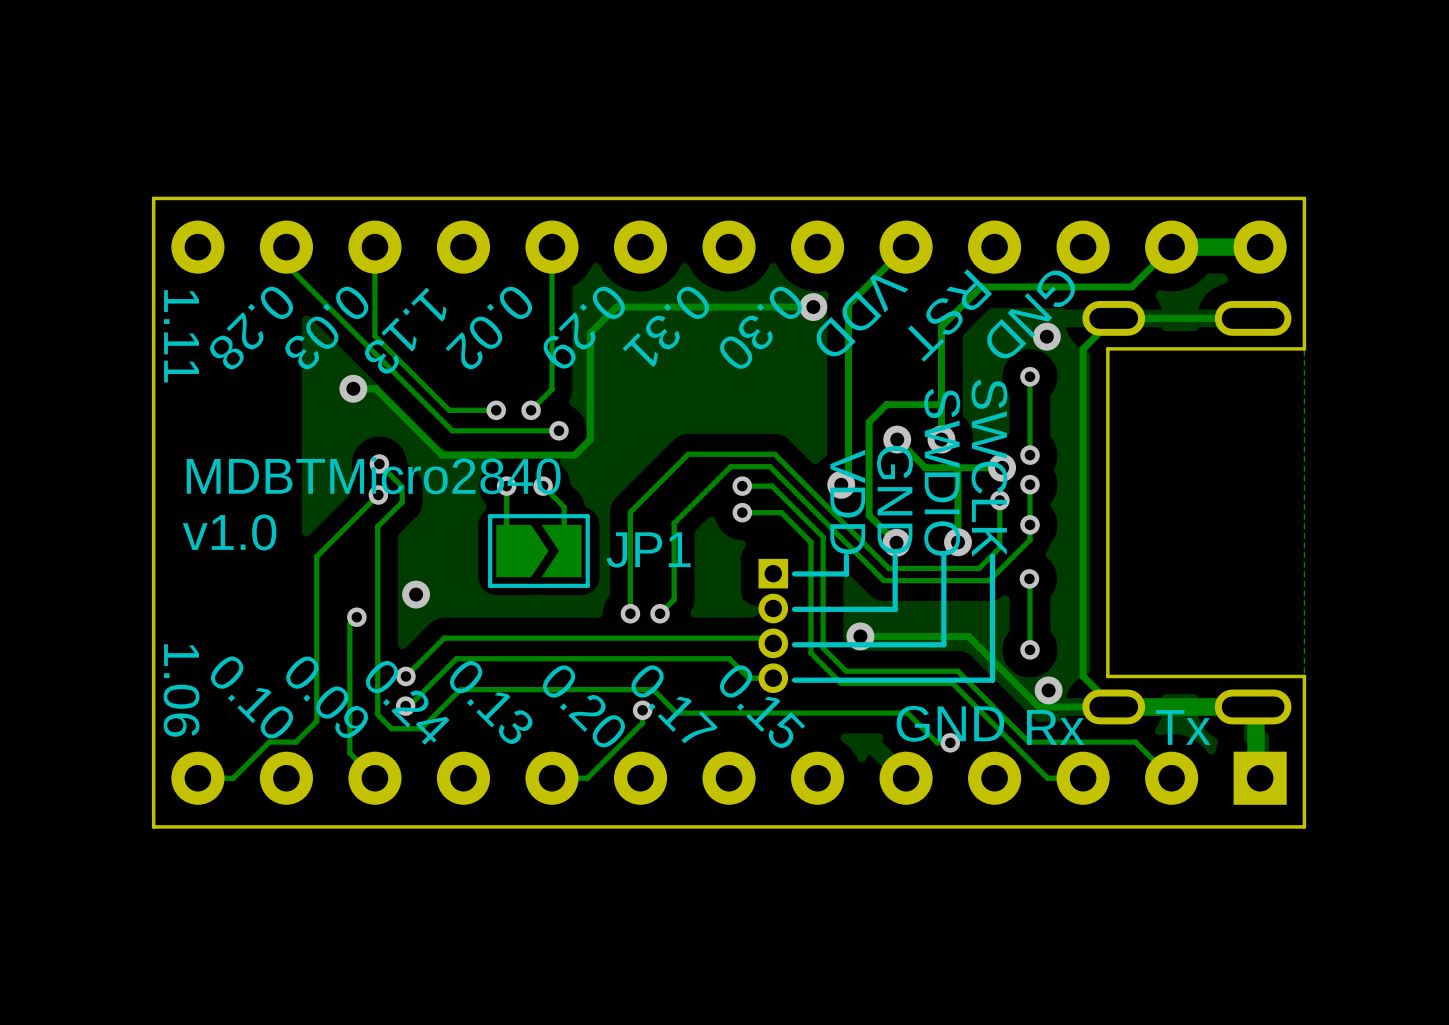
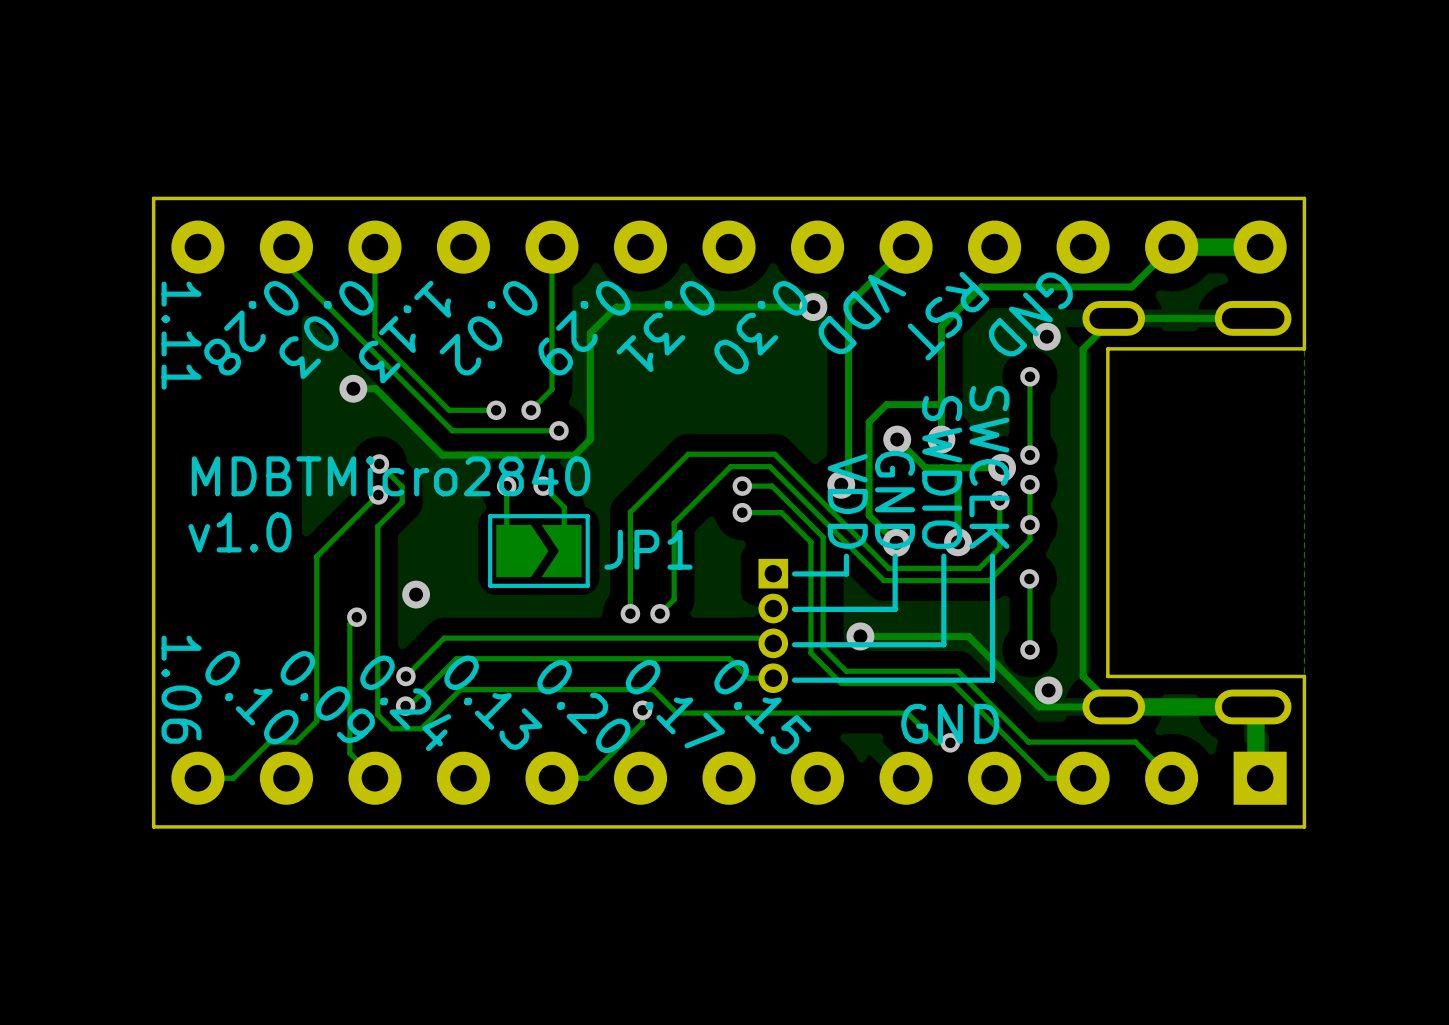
text: Rx (1055, 727) -> none
text: Tx (1183, 727) -> none

